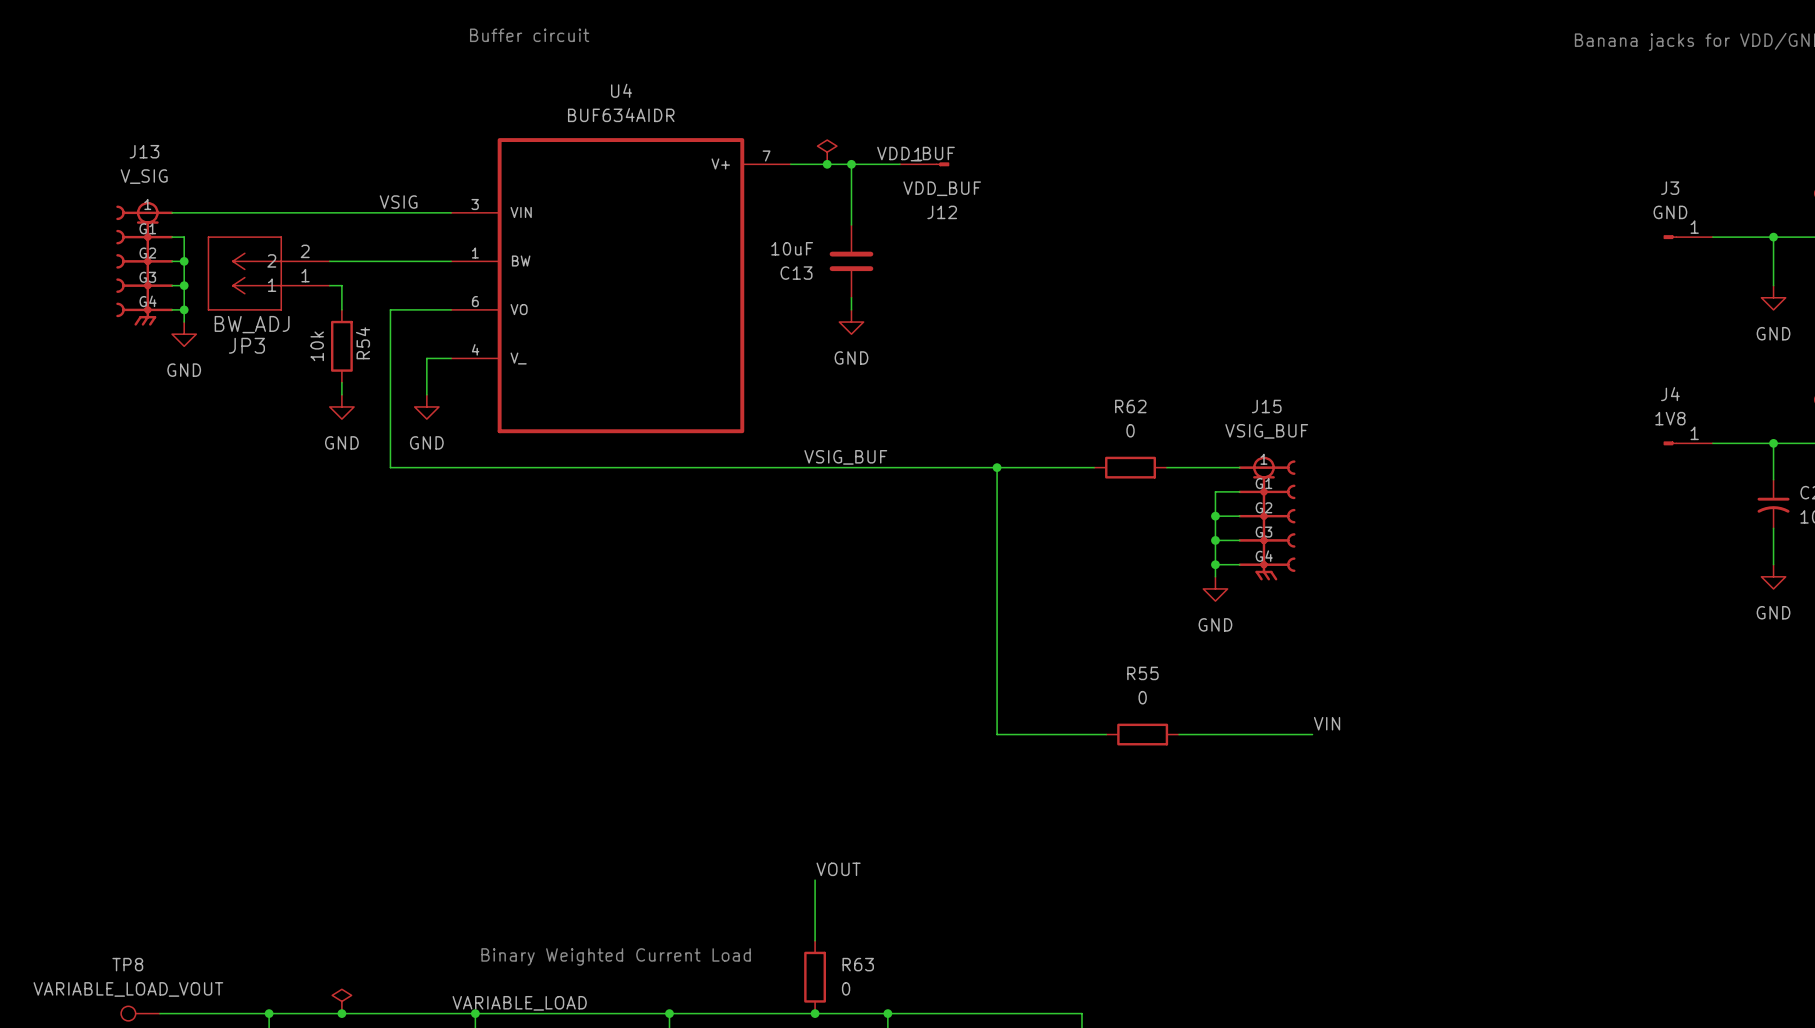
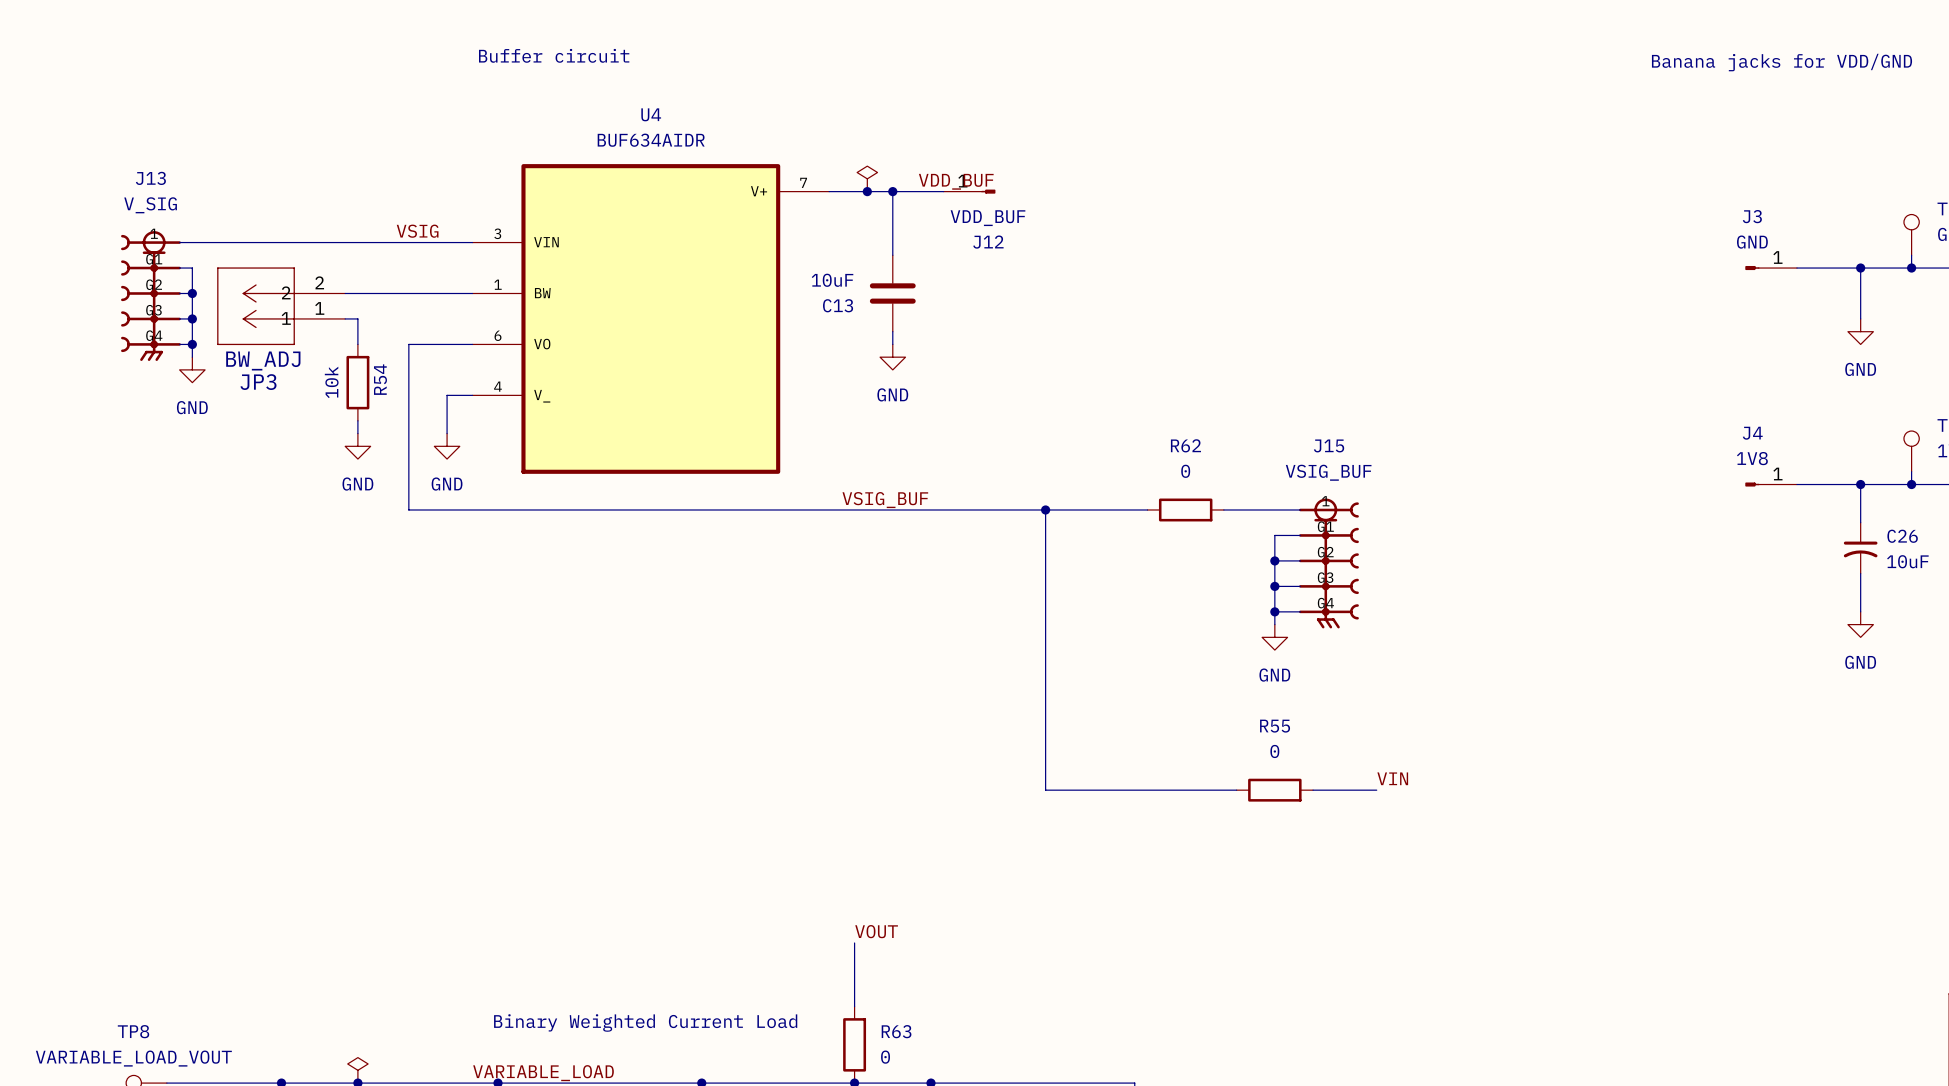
R55 position: (1142, 734) -> (1274, 790)
wire: (1179, 734) (1251, 734) -> (1236, 790) (1160, 790)

